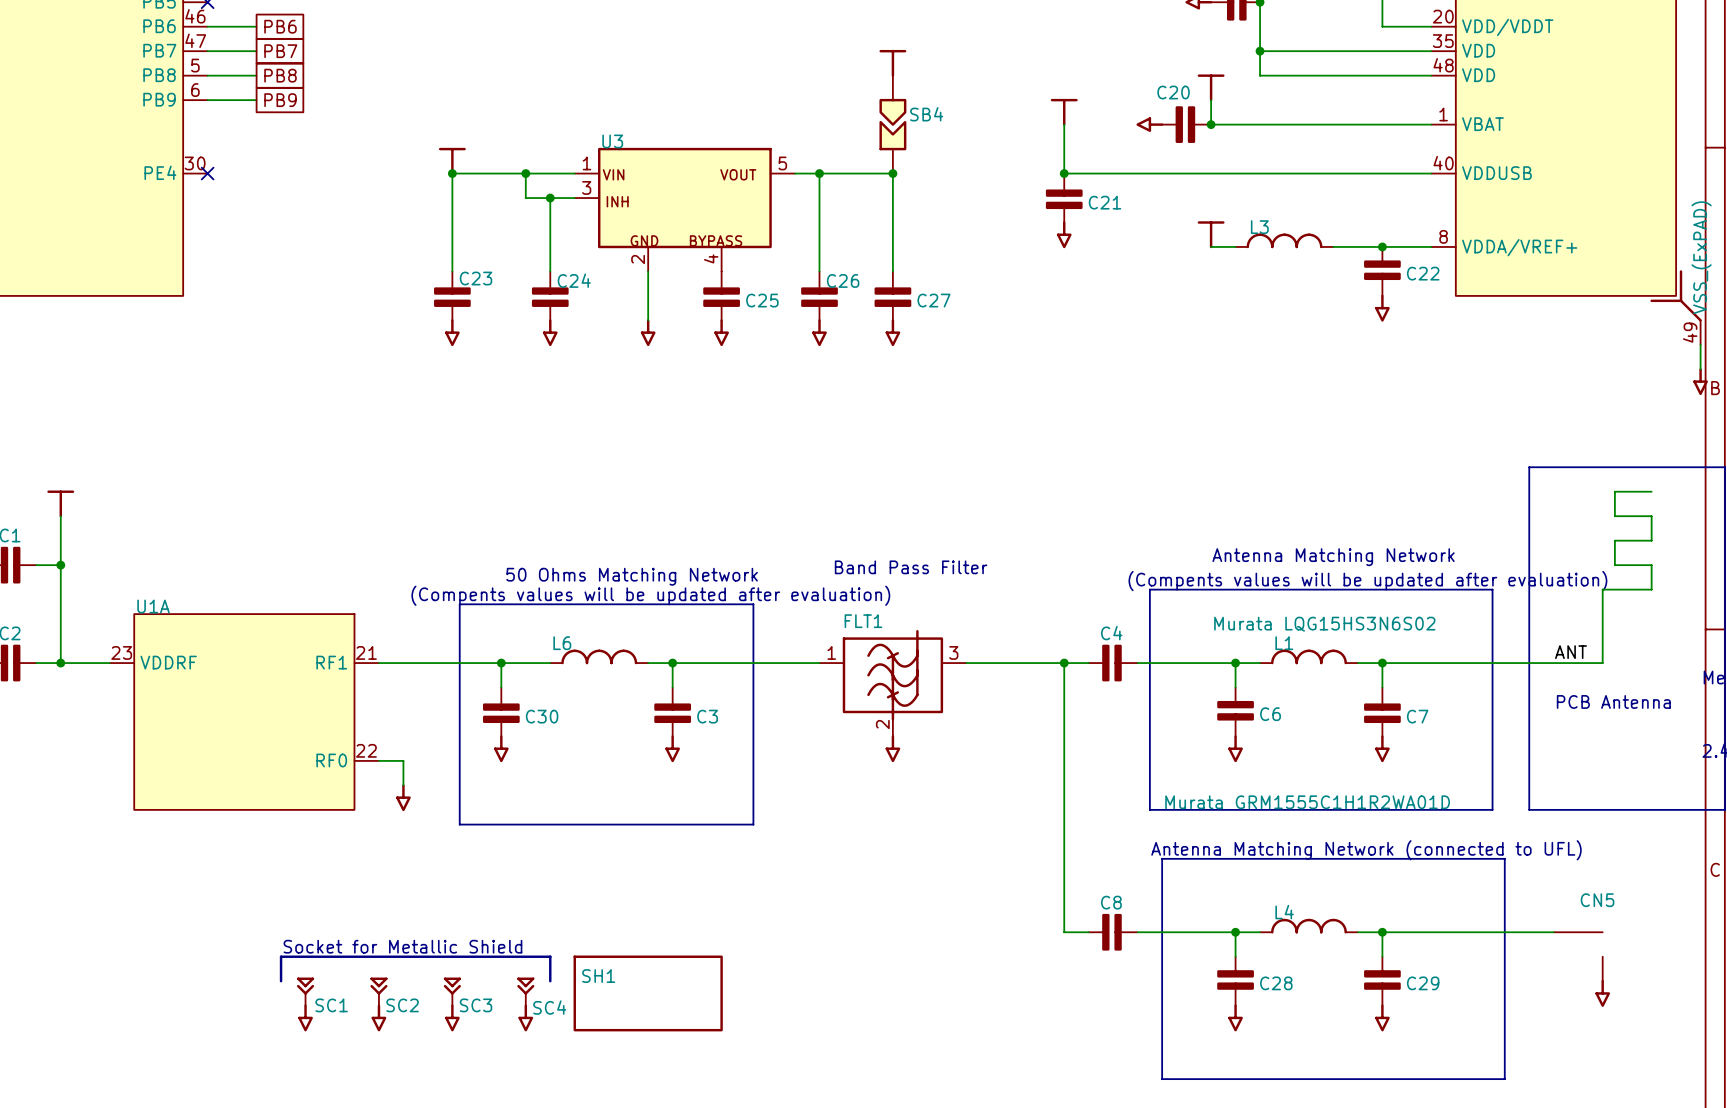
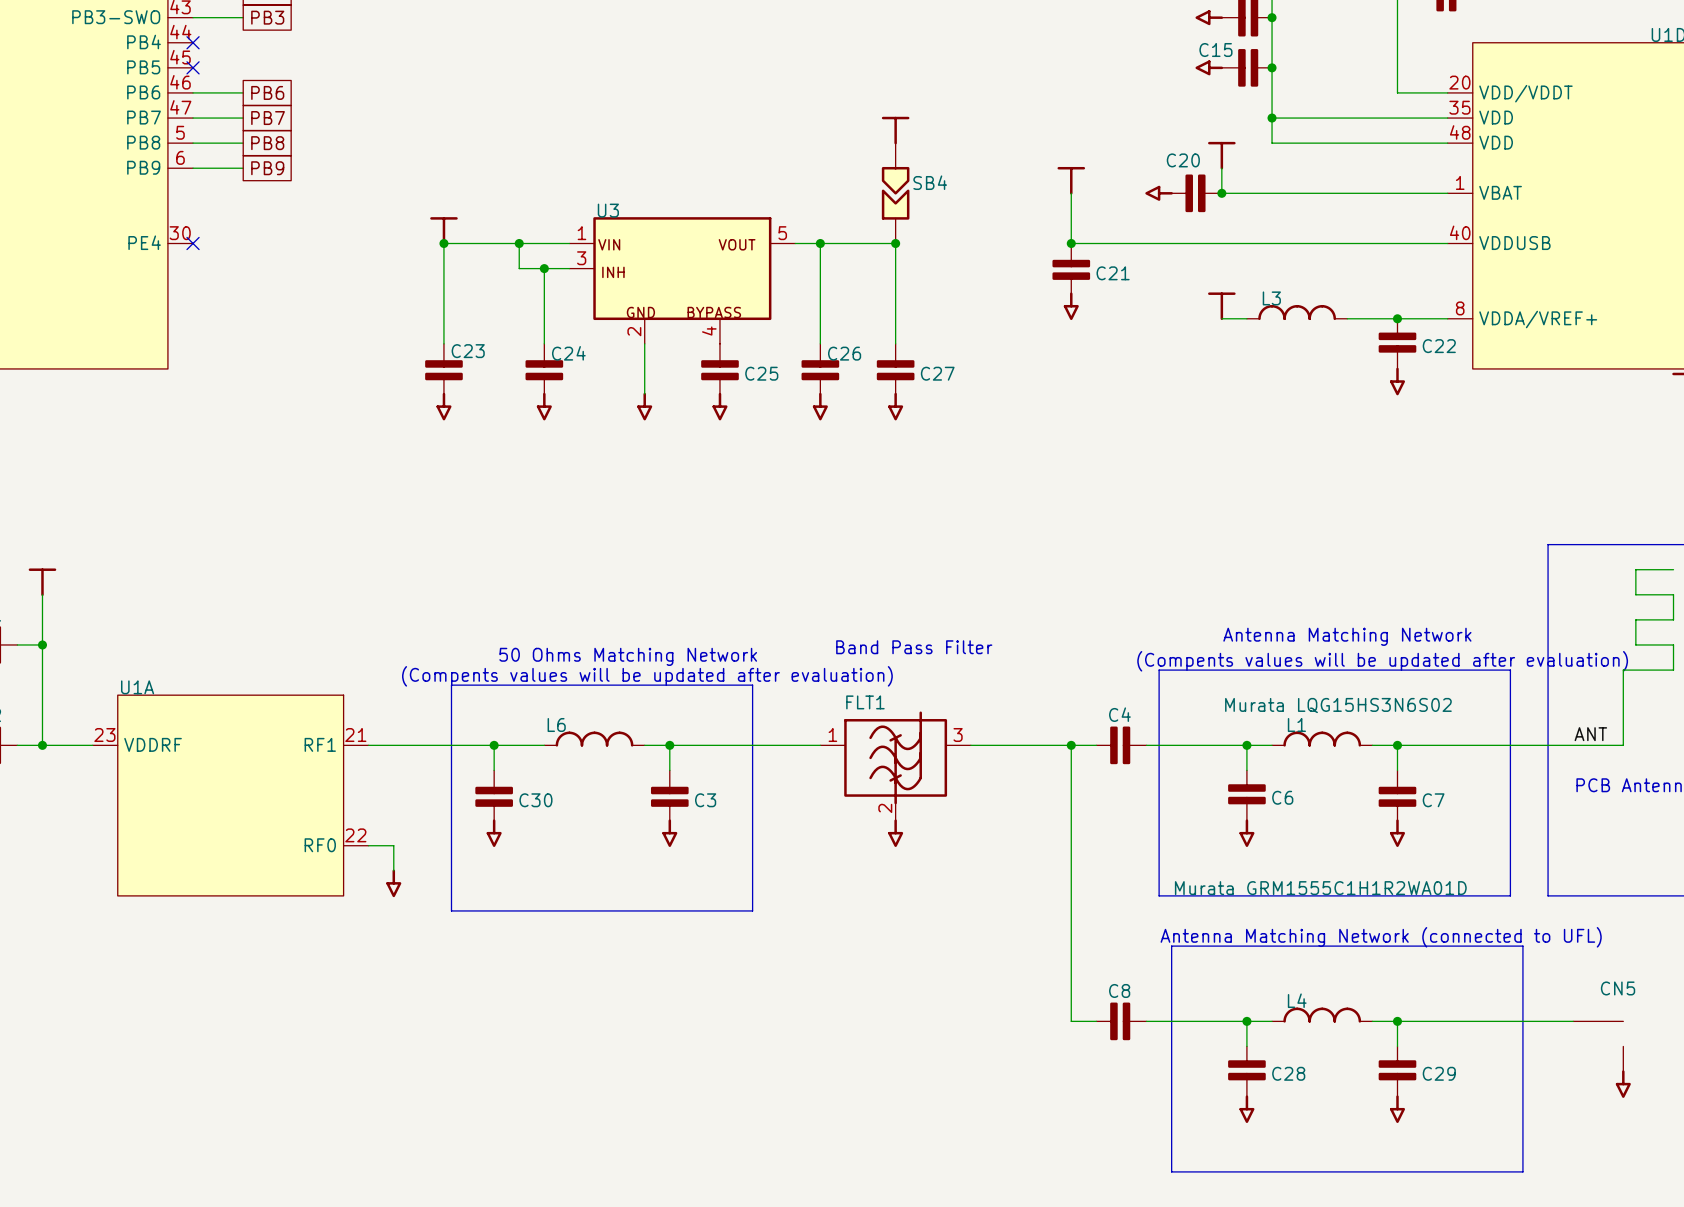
text: Socket for Metallic Shield (402, 946) -> none
line: (281, 981) (281, 956) (550, 956) (550, 981) -> none
SC1: (305, 991) -> none
SC2: (378, 991) -> none
SC3: (452, 991) -> none
SC4: (525, 991) -> none
SH1: (648, 993) -> none
power symbol: (305, 1017) -> none
power symbol: (378, 1017) -> none
power symbol: (452, 1017) -> none
power symbol: (525, 1017) -> none

